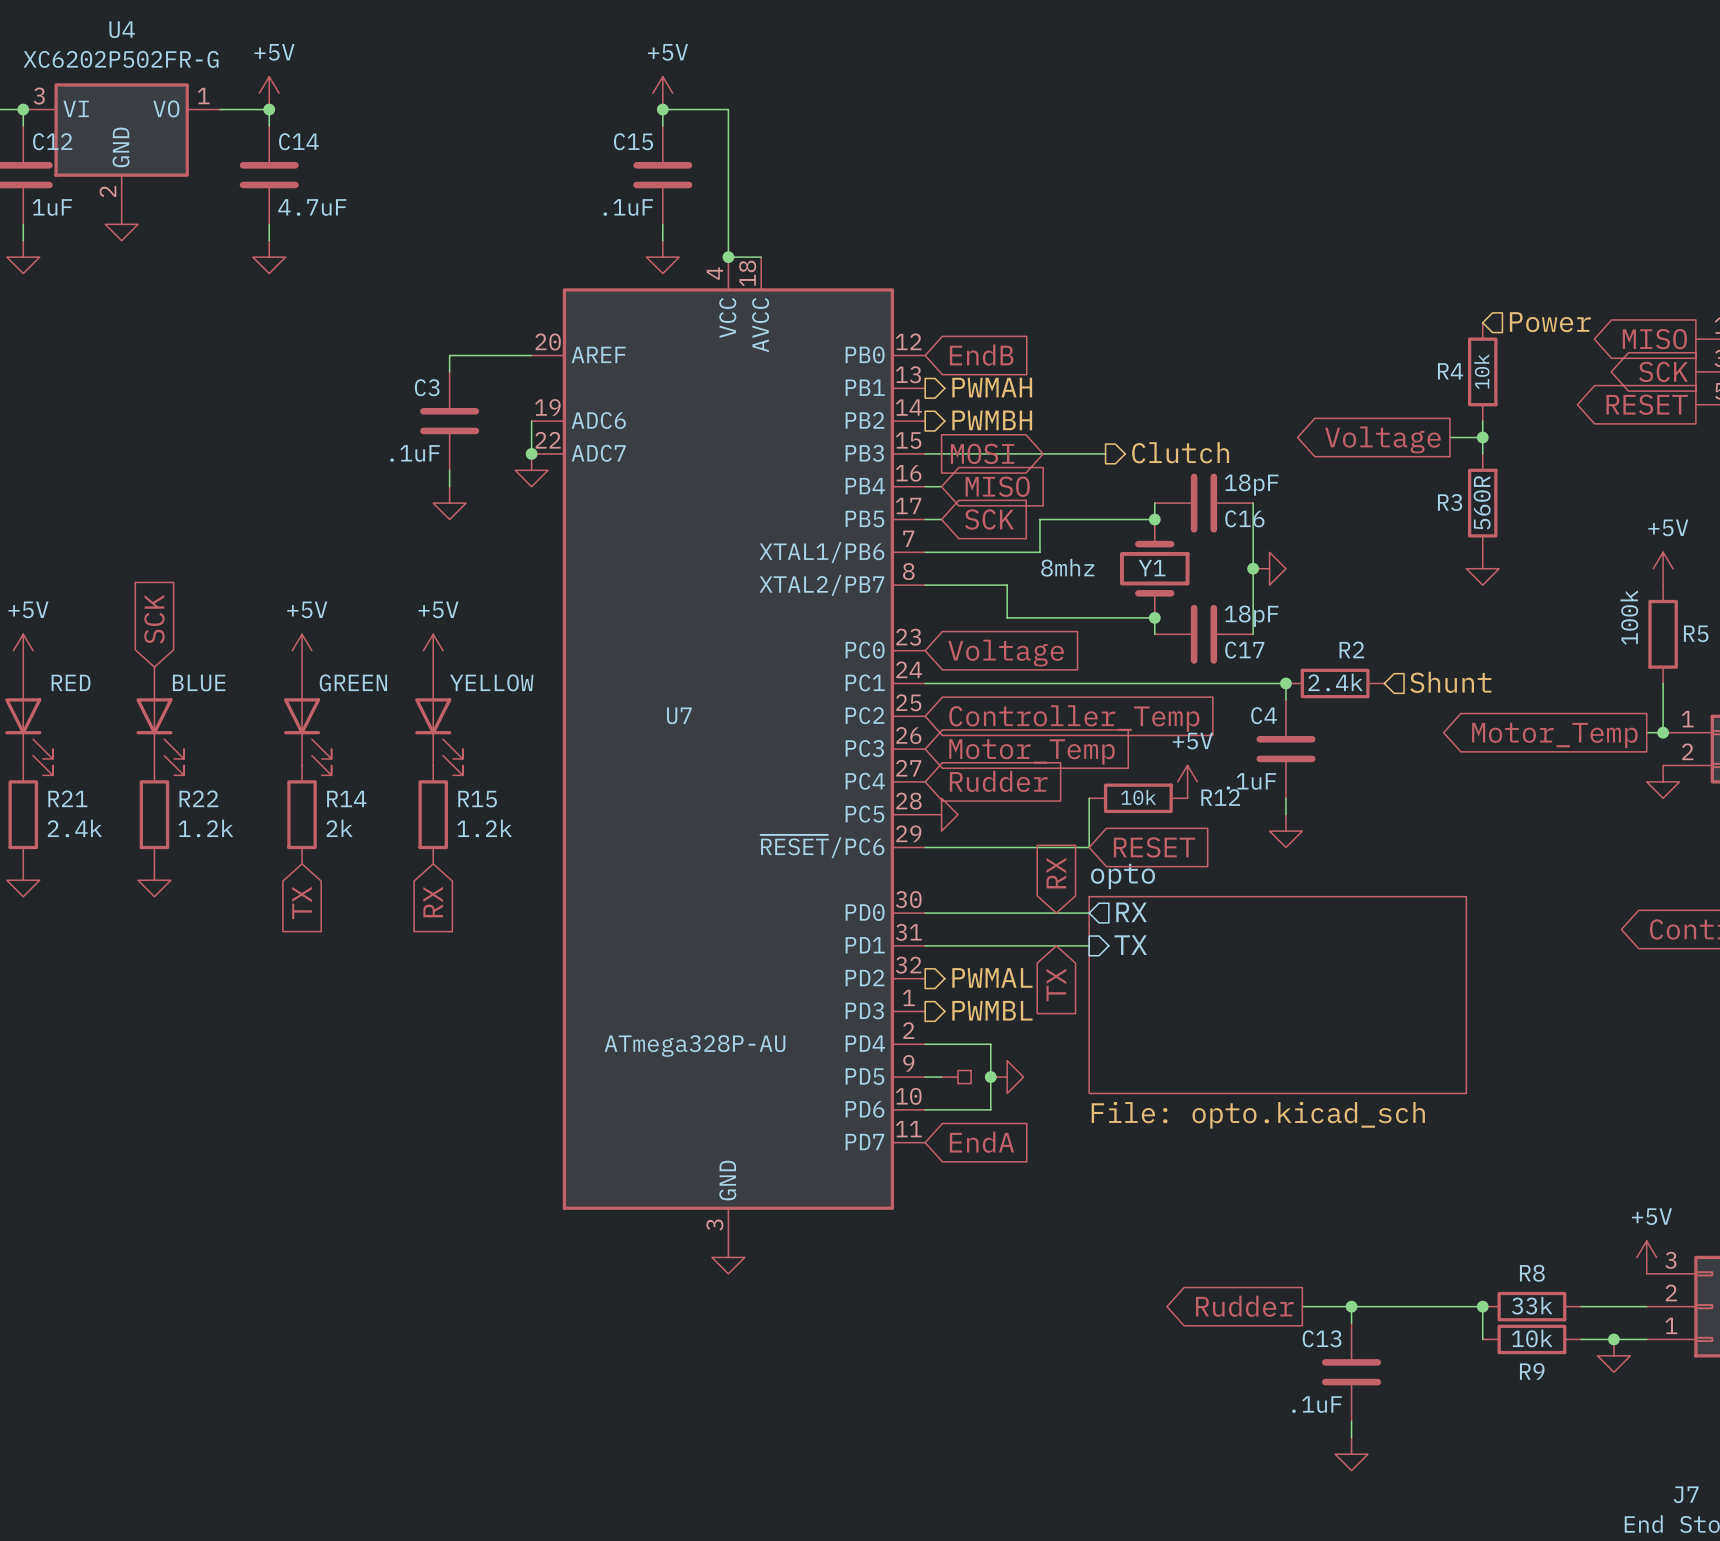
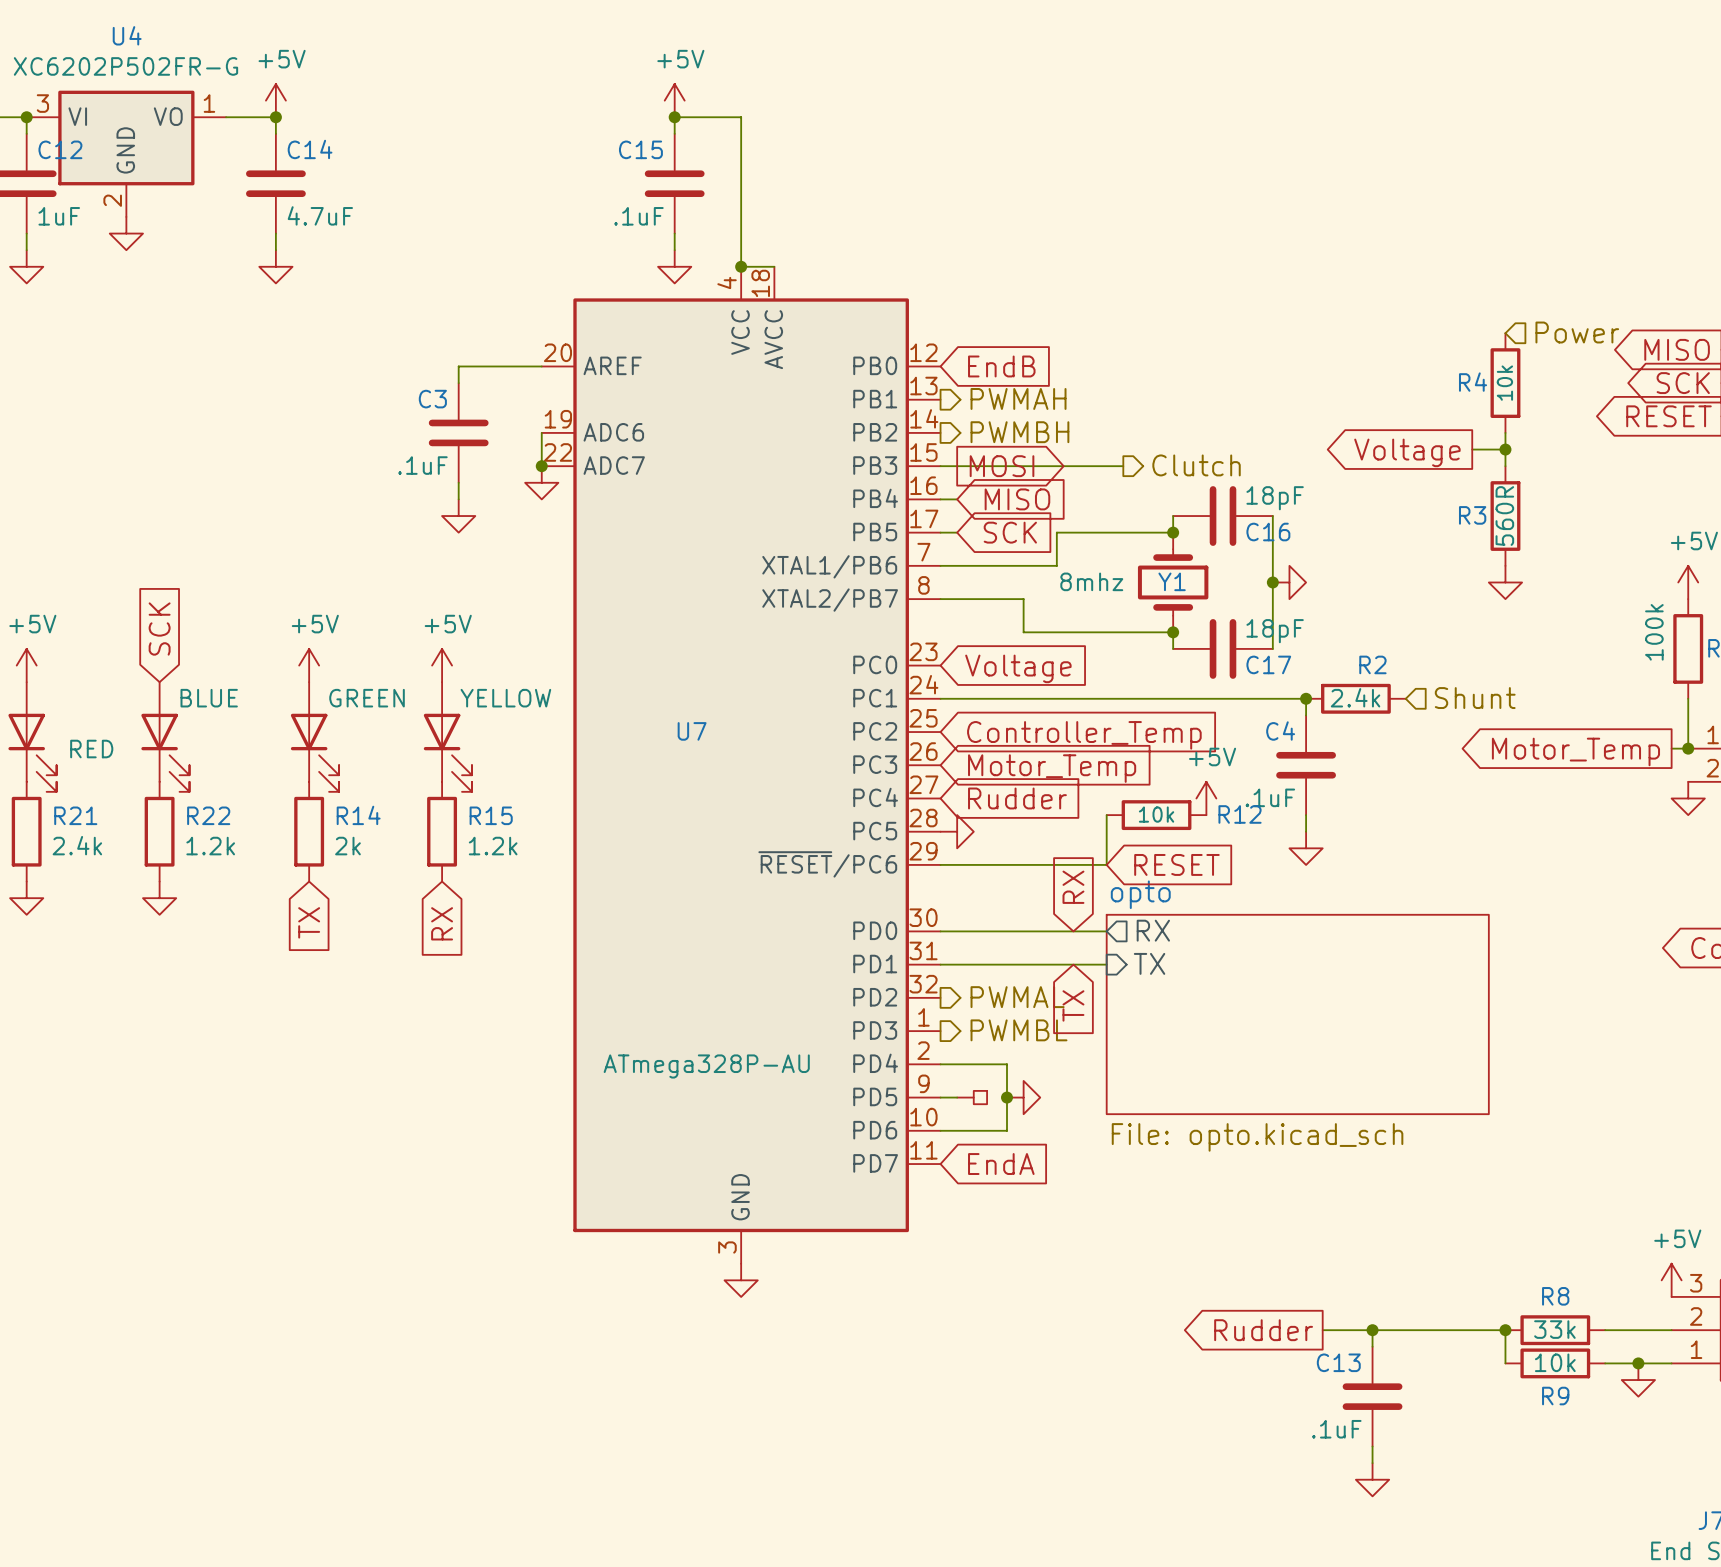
part value position: RED (71, 682) -> RED (91, 749)

